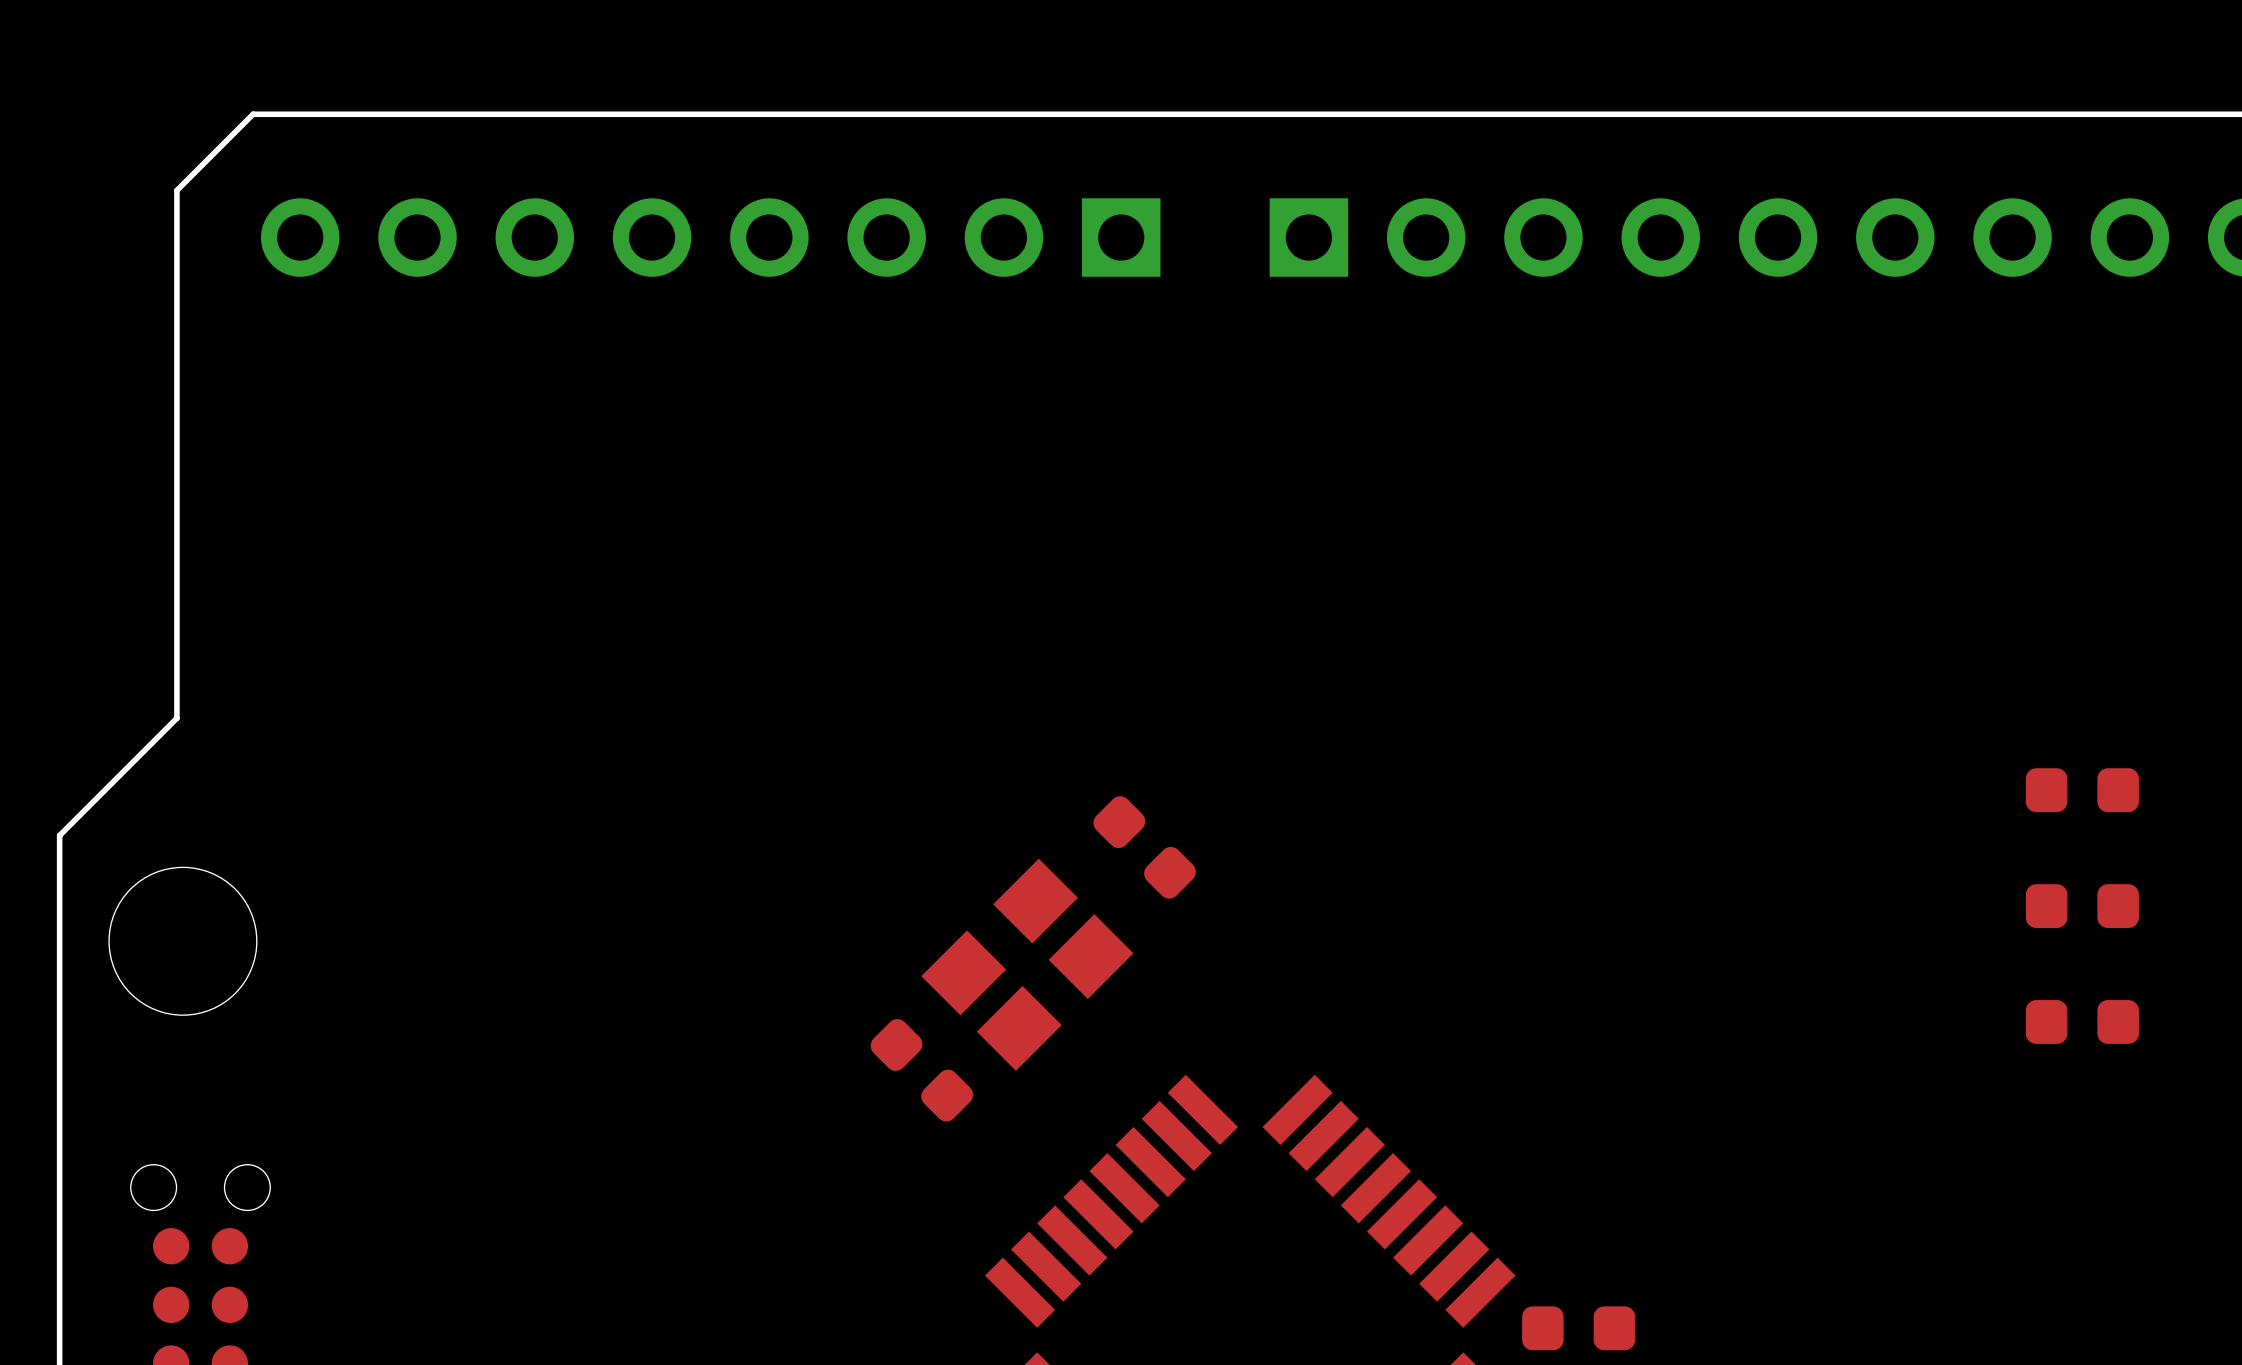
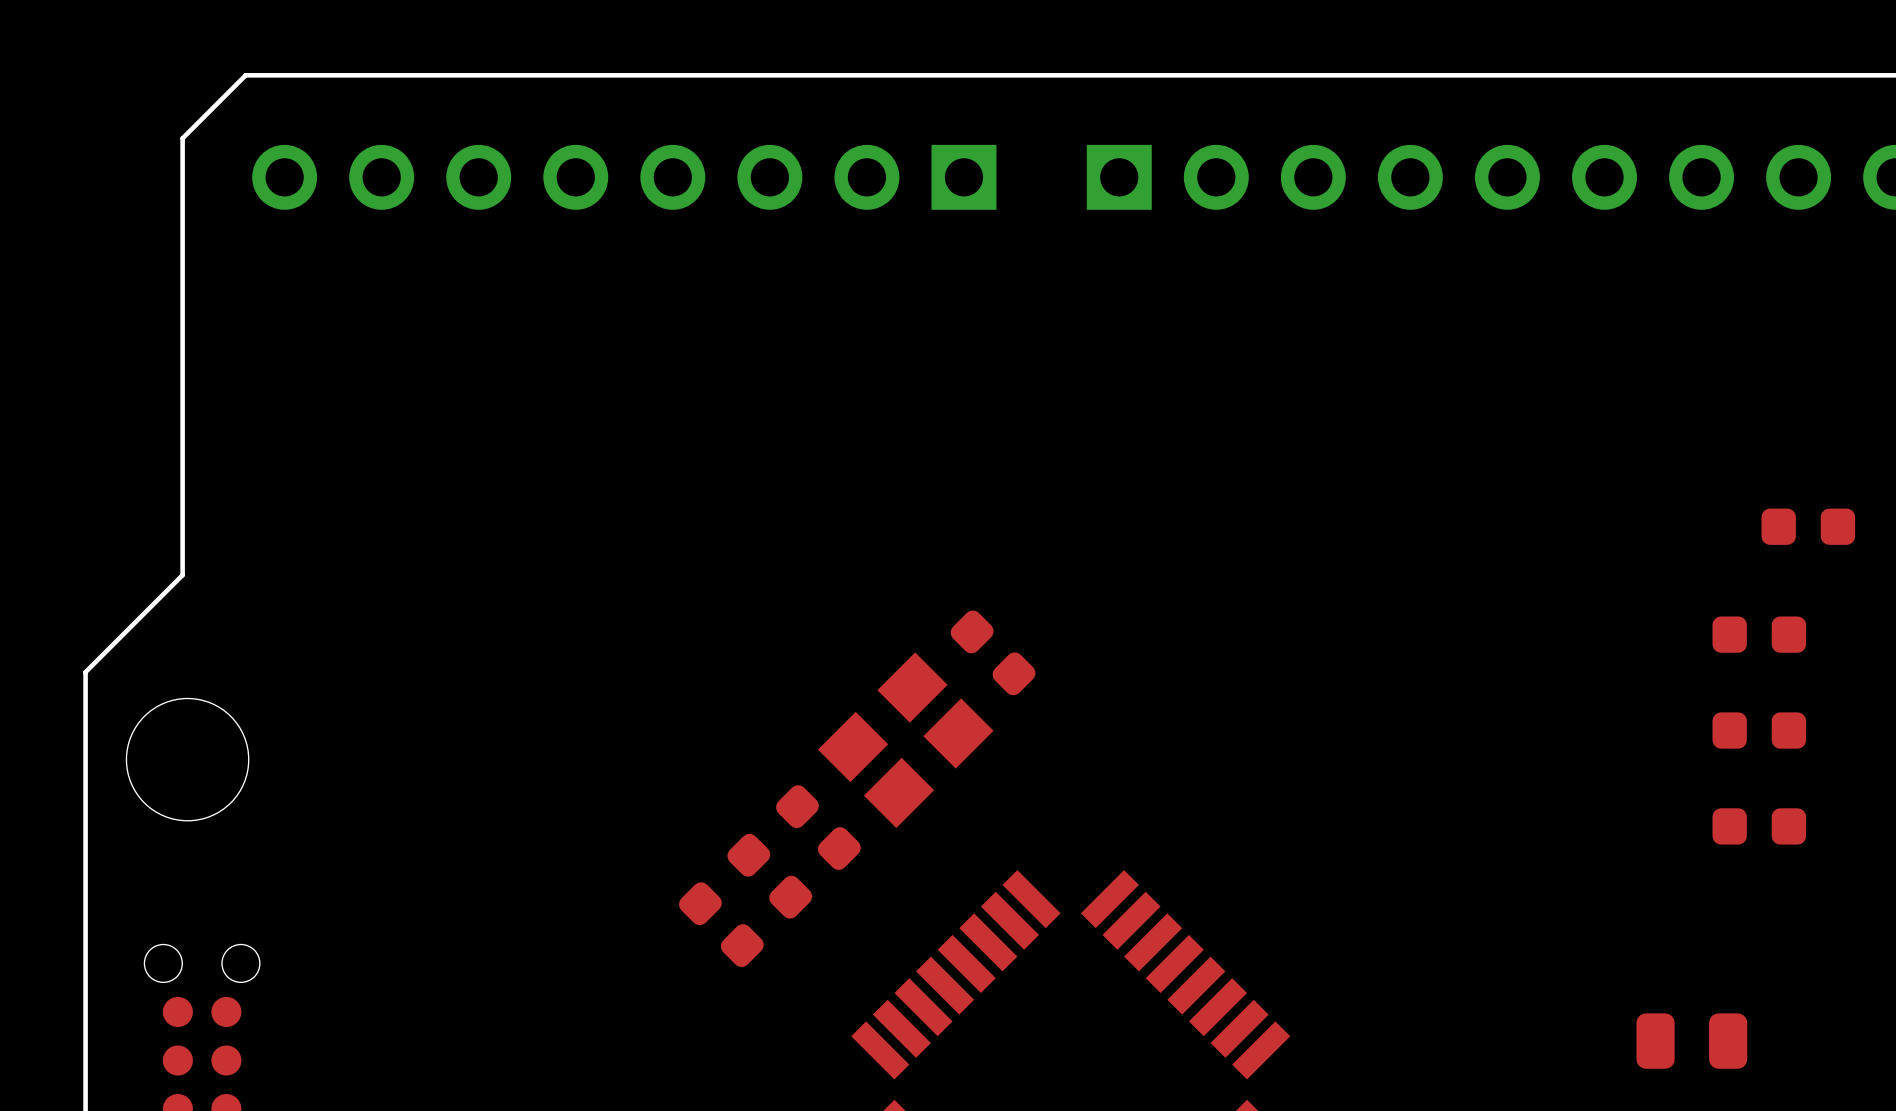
part position: (1144, 847) -> (993, 652)
part position: (1027, 964) -> (905, 740)
part: none -> (818, 827)
part: (921, 1070) -> none
part: none -> (769, 876)
part: none -> (721, 924)
part: none -> (1691, 1041)
part position: (1578, 1328) -> (1808, 526)

